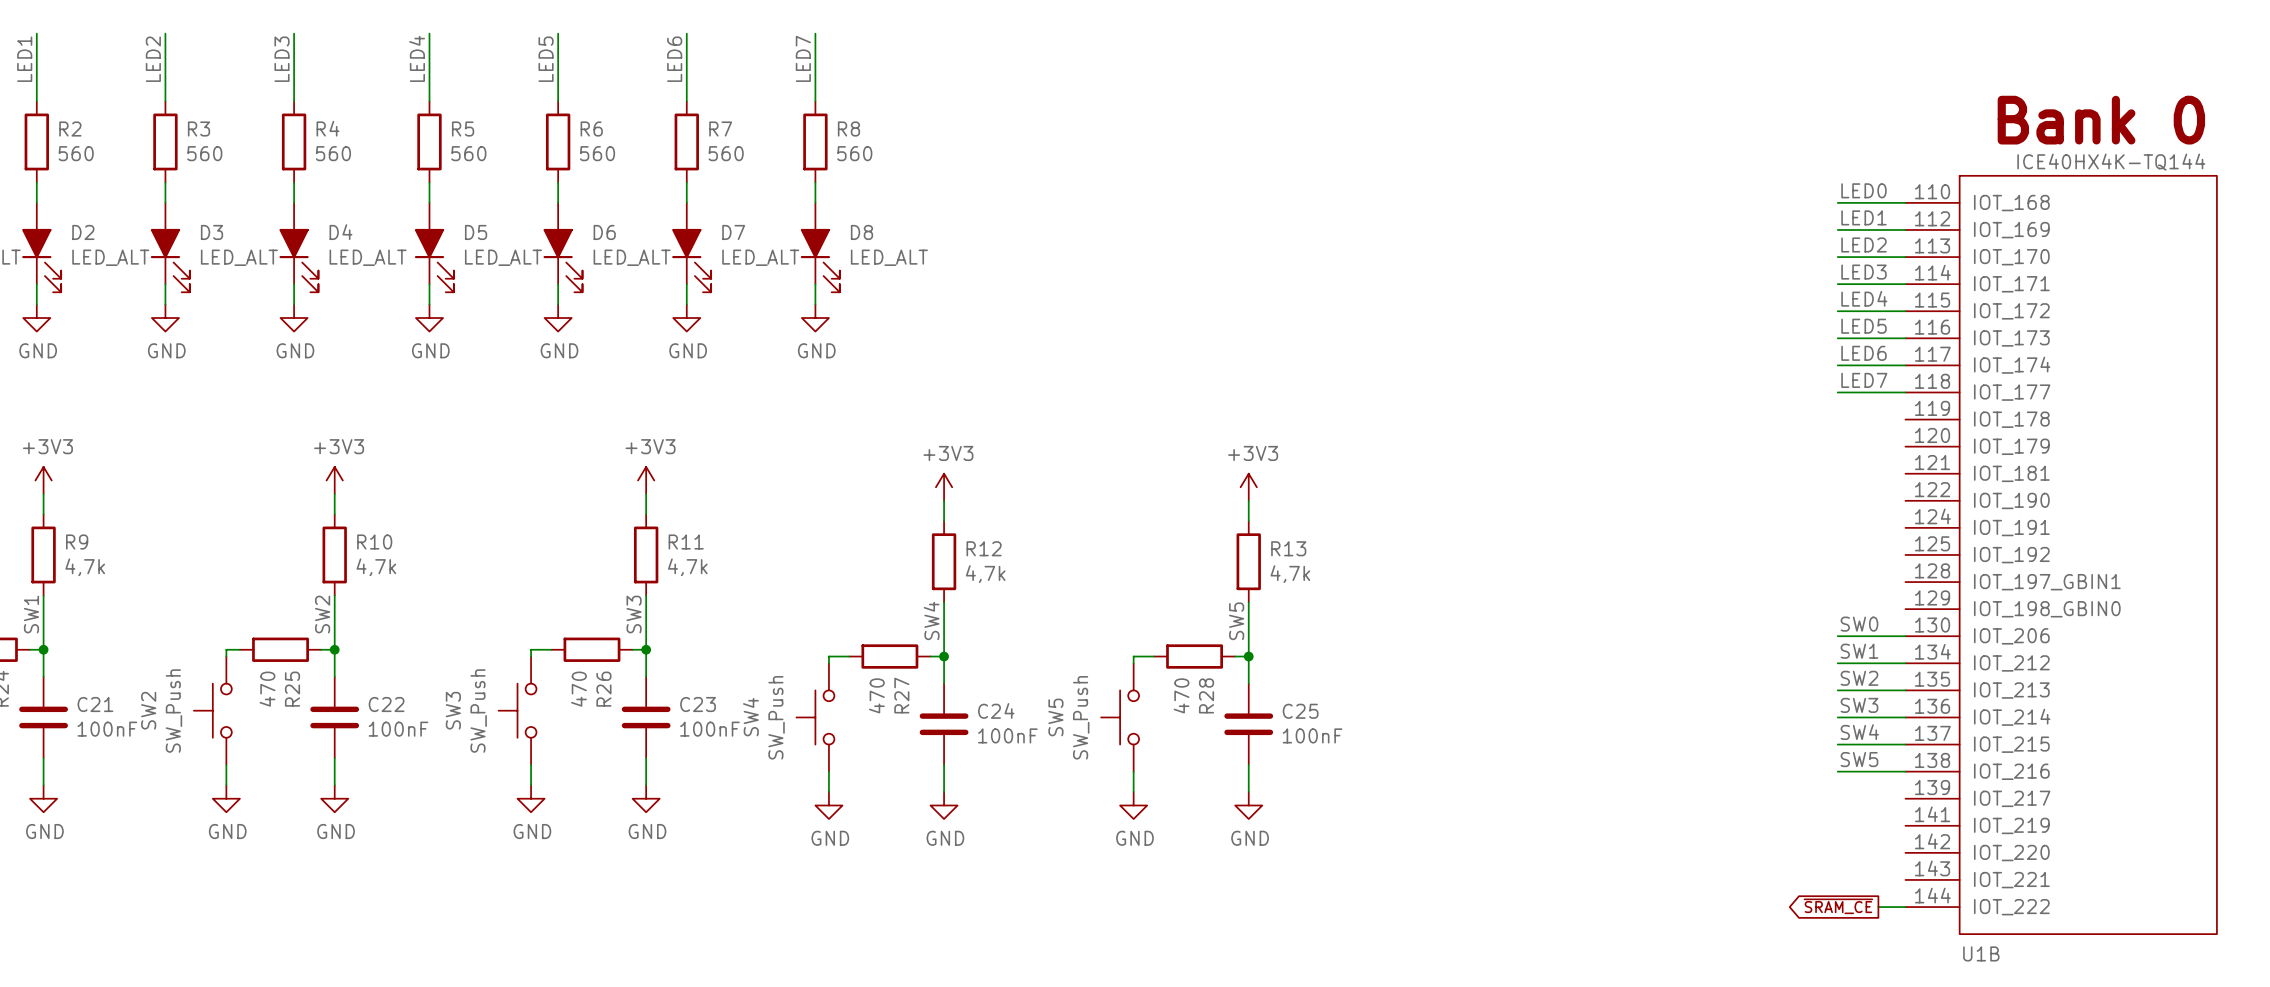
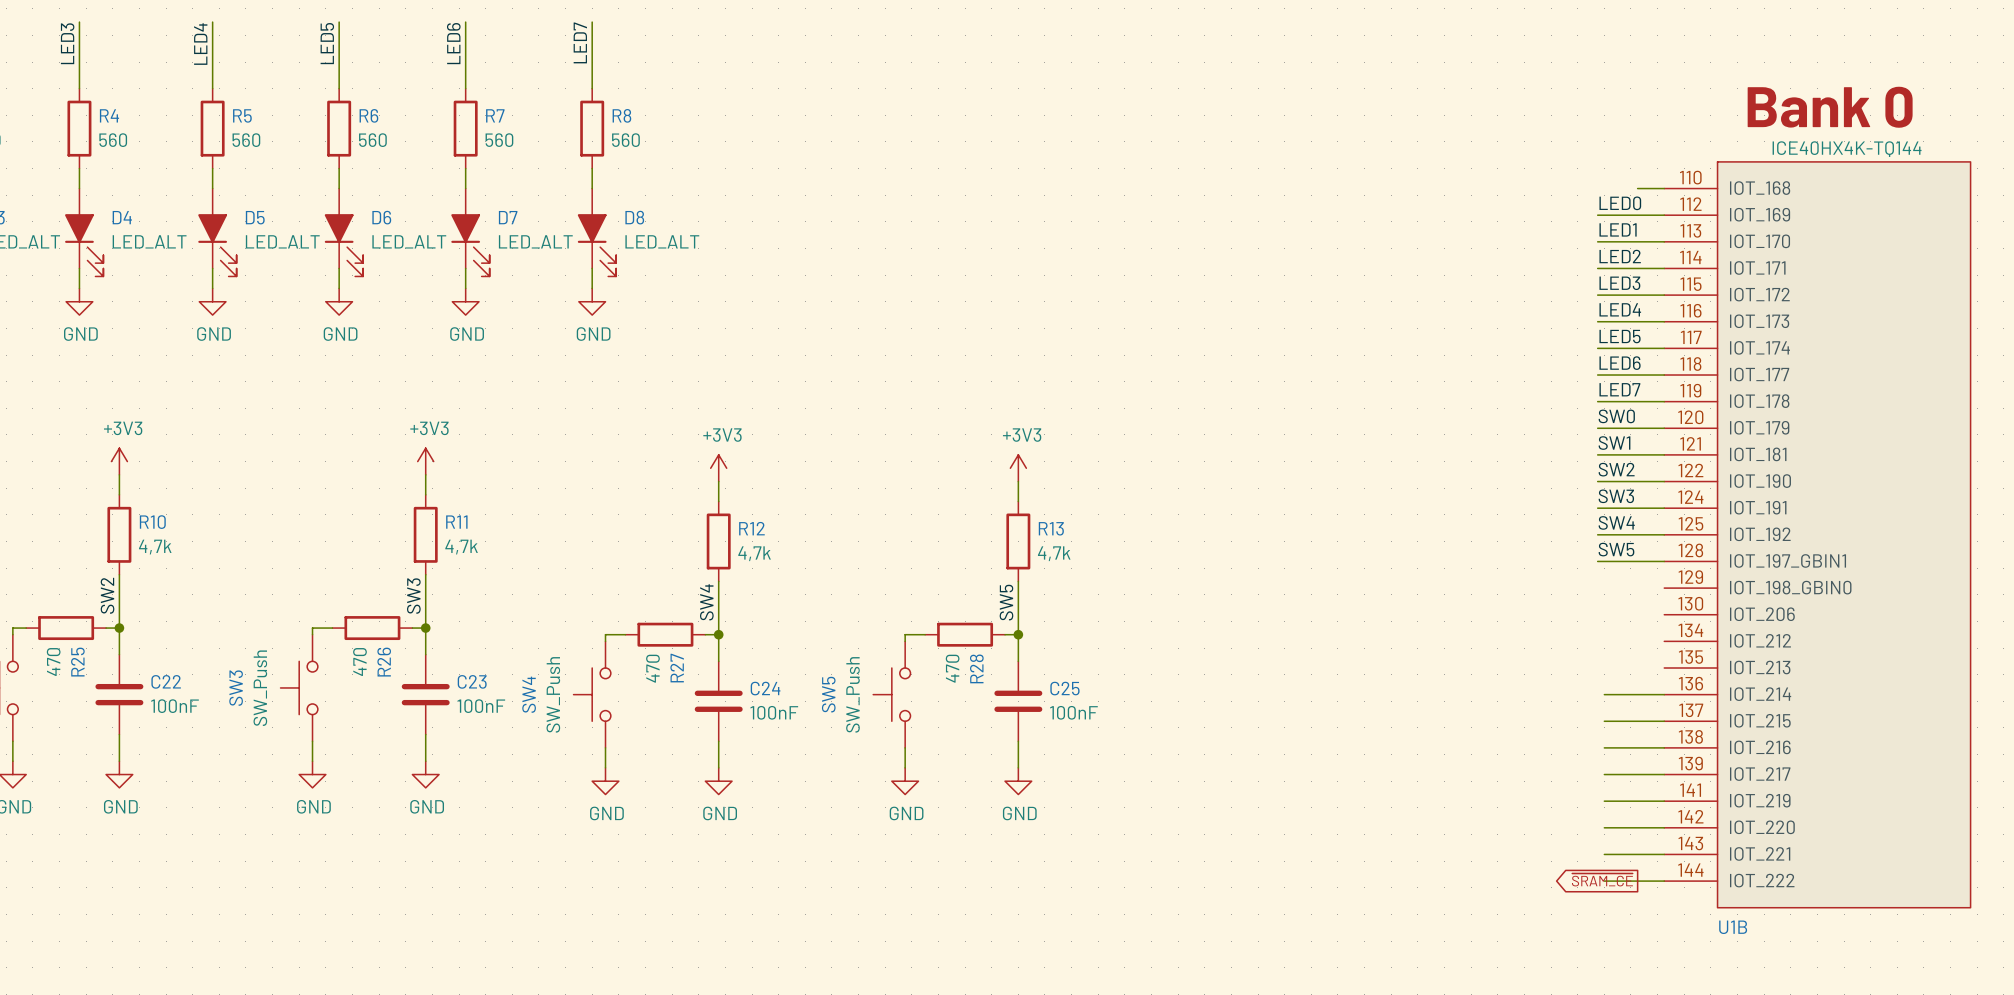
label: LED0 (1863, 190) -> none
wire: (1837, 202) (1878, 202) -> none
label: LED1 (1863, 217) -> LED0 (1620, 203)
label: LED2 (1863, 244) -> LED1 (1618, 229)
label: LED3 (1863, 272) -> LED2 (1620, 256)
label: LED4 (1864, 298) -> LED3 (1619, 283)
label: LED5 (1863, 326) -> LED4 (1620, 309)
label: LED6 (1863, 353) -> LED5 (1620, 336)
label: LED7 (1864, 380) -> LED6 (1620, 363)
label: none -> LED7 (1619, 389)
wire: none -> (1597, 401) (1664, 401)
wire: none -> (1597, 428) (1664, 428)
wire: none -> (1597, 454) (1664, 454)
wire: none -> (1597, 481) (1664, 481)
label position: SW0 (1859, 624) -> SW0 (1616, 416)
wire: (1837, 636) (1905, 636) -> (1597, 508) (1664, 508)
label position: SW1 (1859, 651) -> SW1 (1614, 443)
wire: (1837, 663) (1905, 663) -> (1597, 534) (1664, 534)
label position: SW2 (1859, 678) -> SW2 (1616, 469)
wire: (1837, 690) (1905, 690) -> (1597, 561) (1664, 561)
label position: SW3 (1859, 705) -> SW3 (1616, 496)
wire: (1837, 717) (1844, 717) -> none
label position: SW4 (1859, 732) -> SW4 (1616, 522)
wire: (1837, 744) (1844, 744) -> none
label position: SW5 (1859, 759) -> SW5 (1616, 549)
wire: (1837, 771) (1844, 771) -> none
wire: none -> (1604, 774) (1664, 774)
wire: none -> (1604, 801) (1664, 801)
wire: none -> (1604, 827) (1664, 827)
wire: none -> (1604, 854) (1664, 854)
wire: none -> (1604, 881) (1637, 881)

